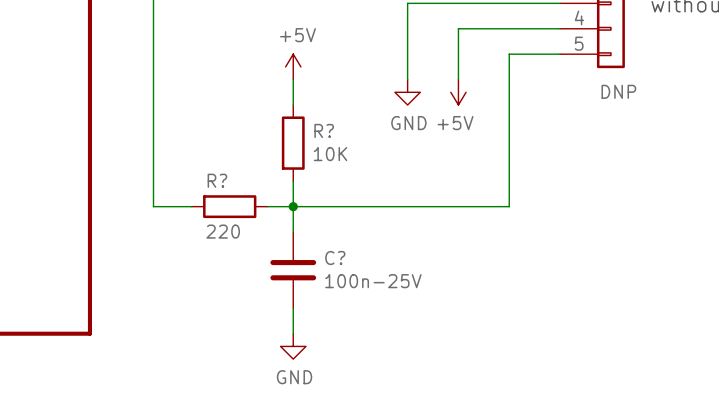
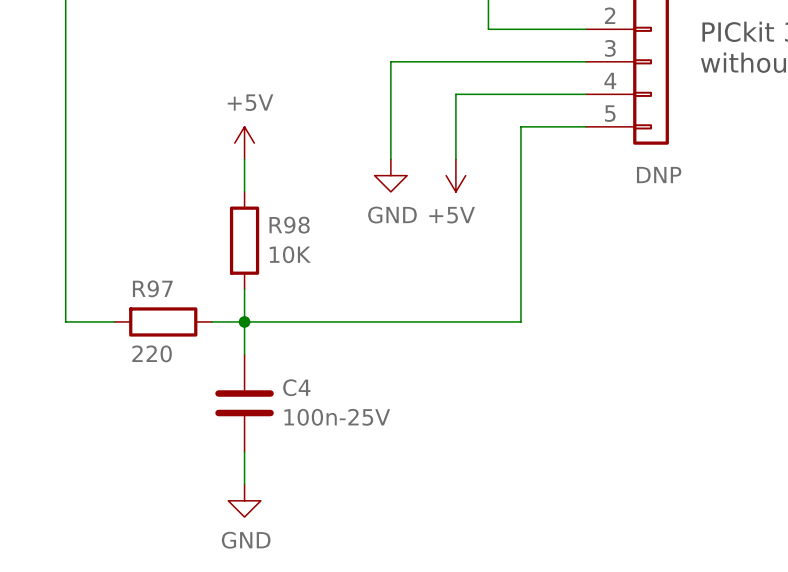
R? name: R? (324, 130) -> R98 (289, 225)
R? name: R? (217, 180) -> R97 (152, 288)
C? name: C? (335, 258) -> C4 (296, 387)

